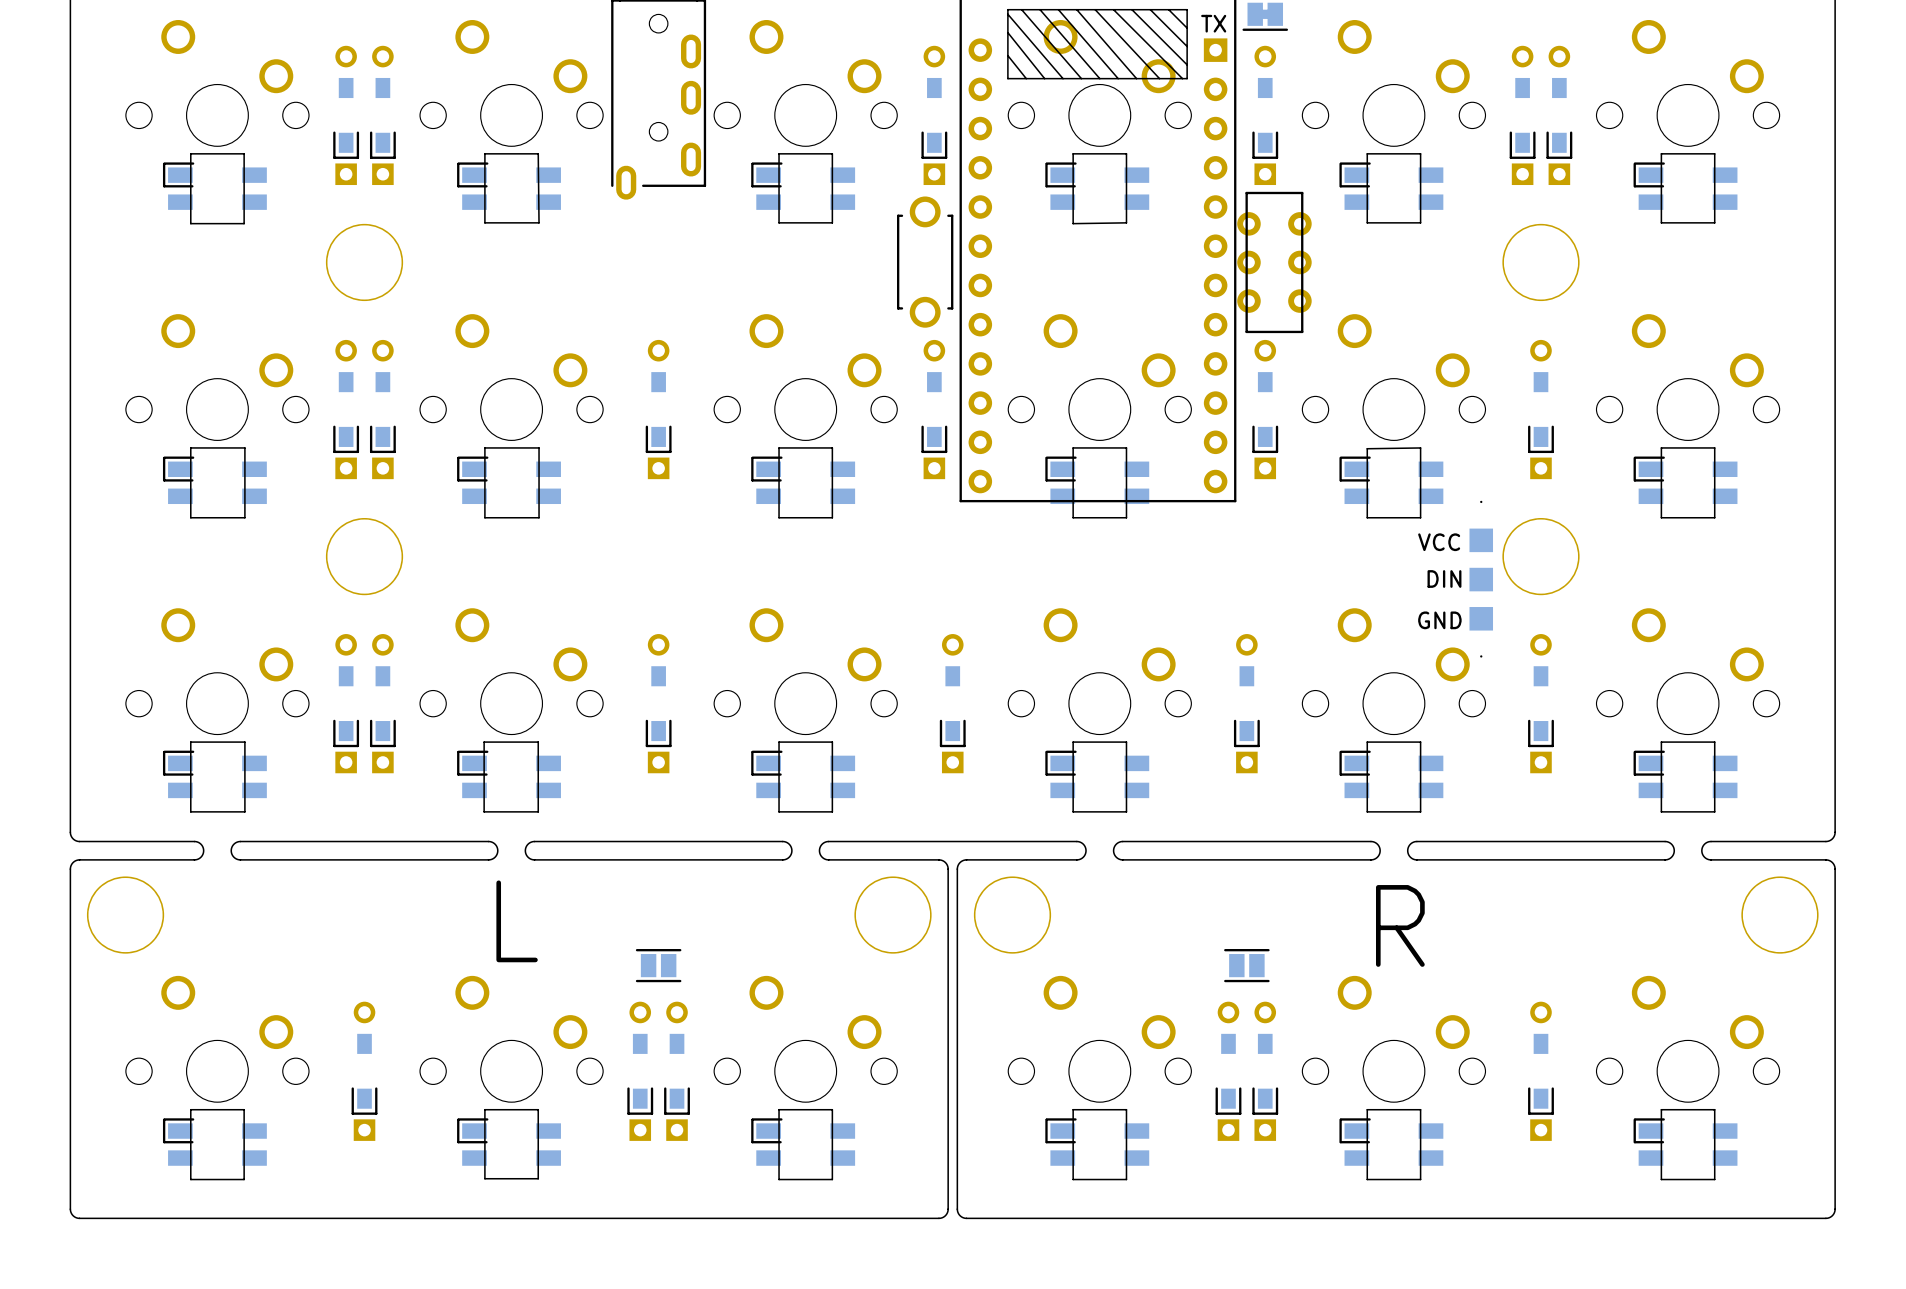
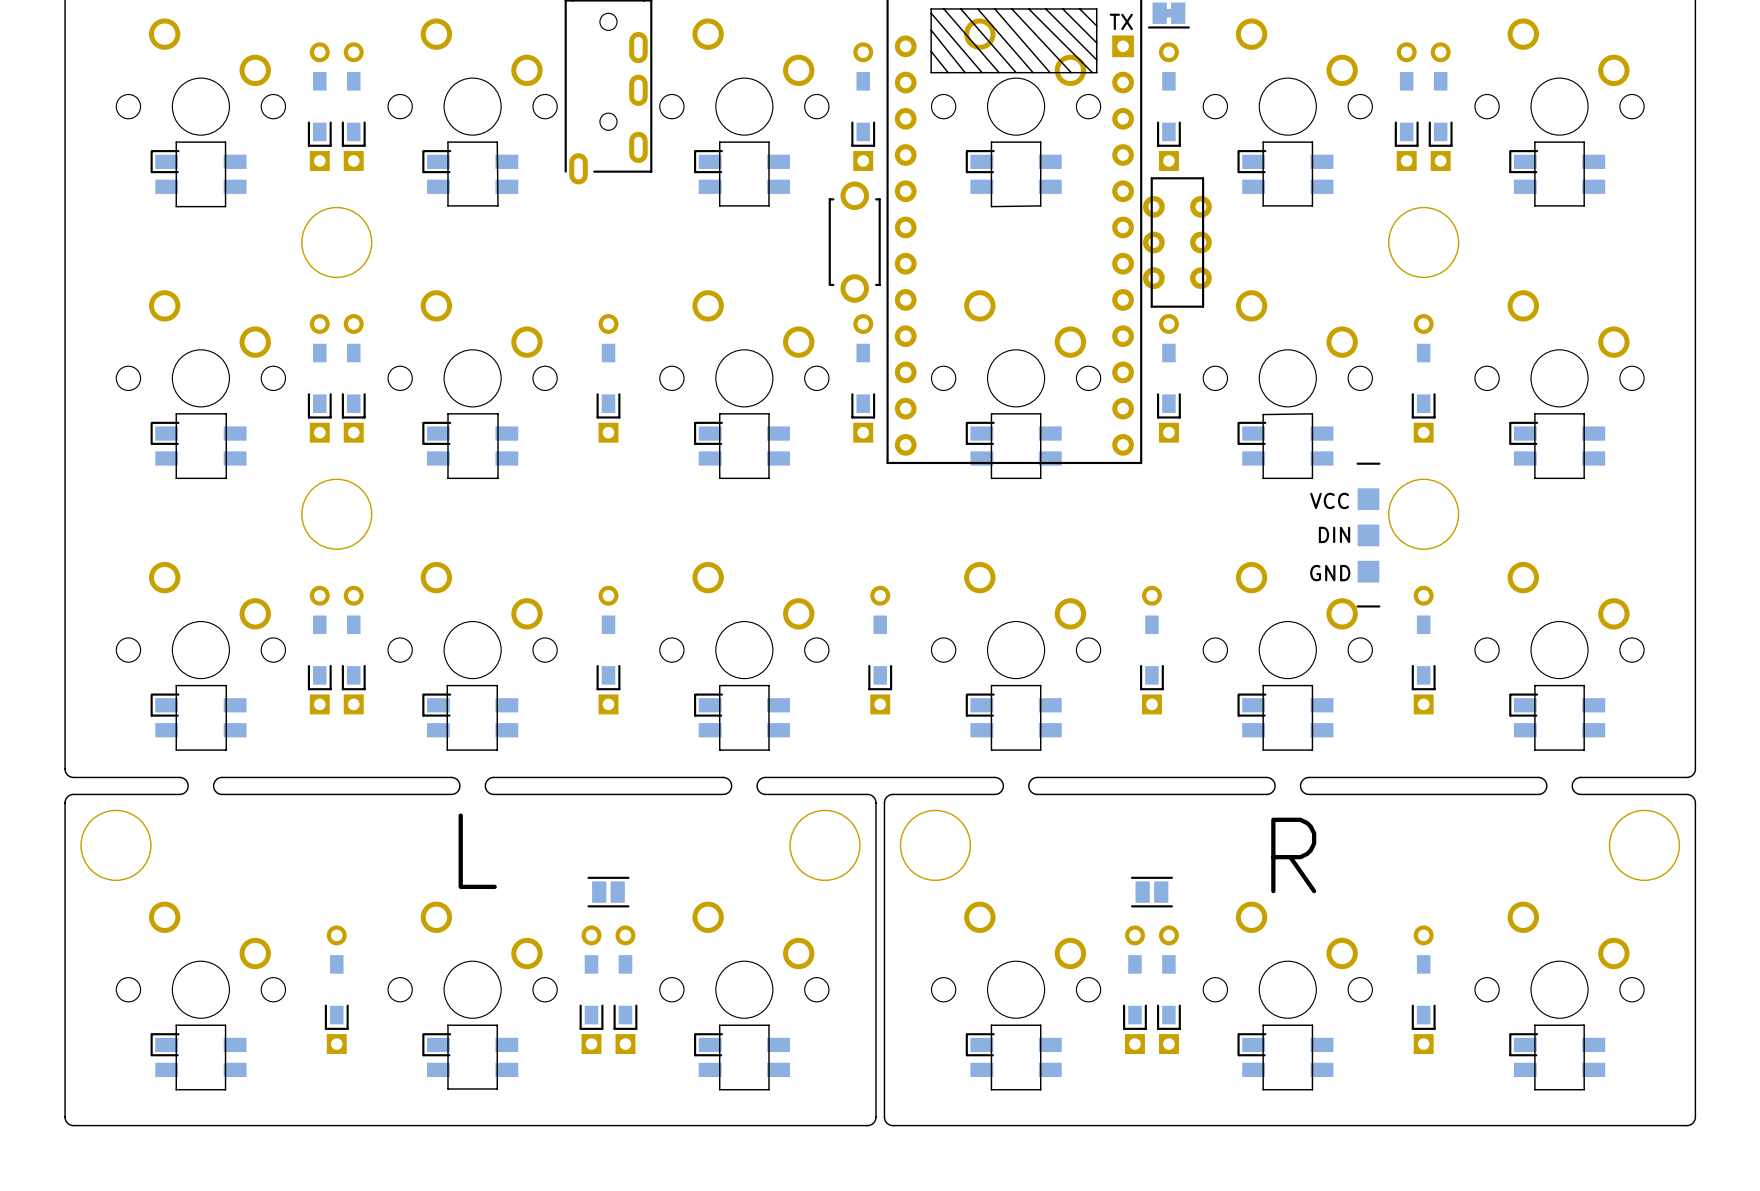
part footprint: [1469, 500, 1494, 658] -> [1356, 462, 1381, 608]

